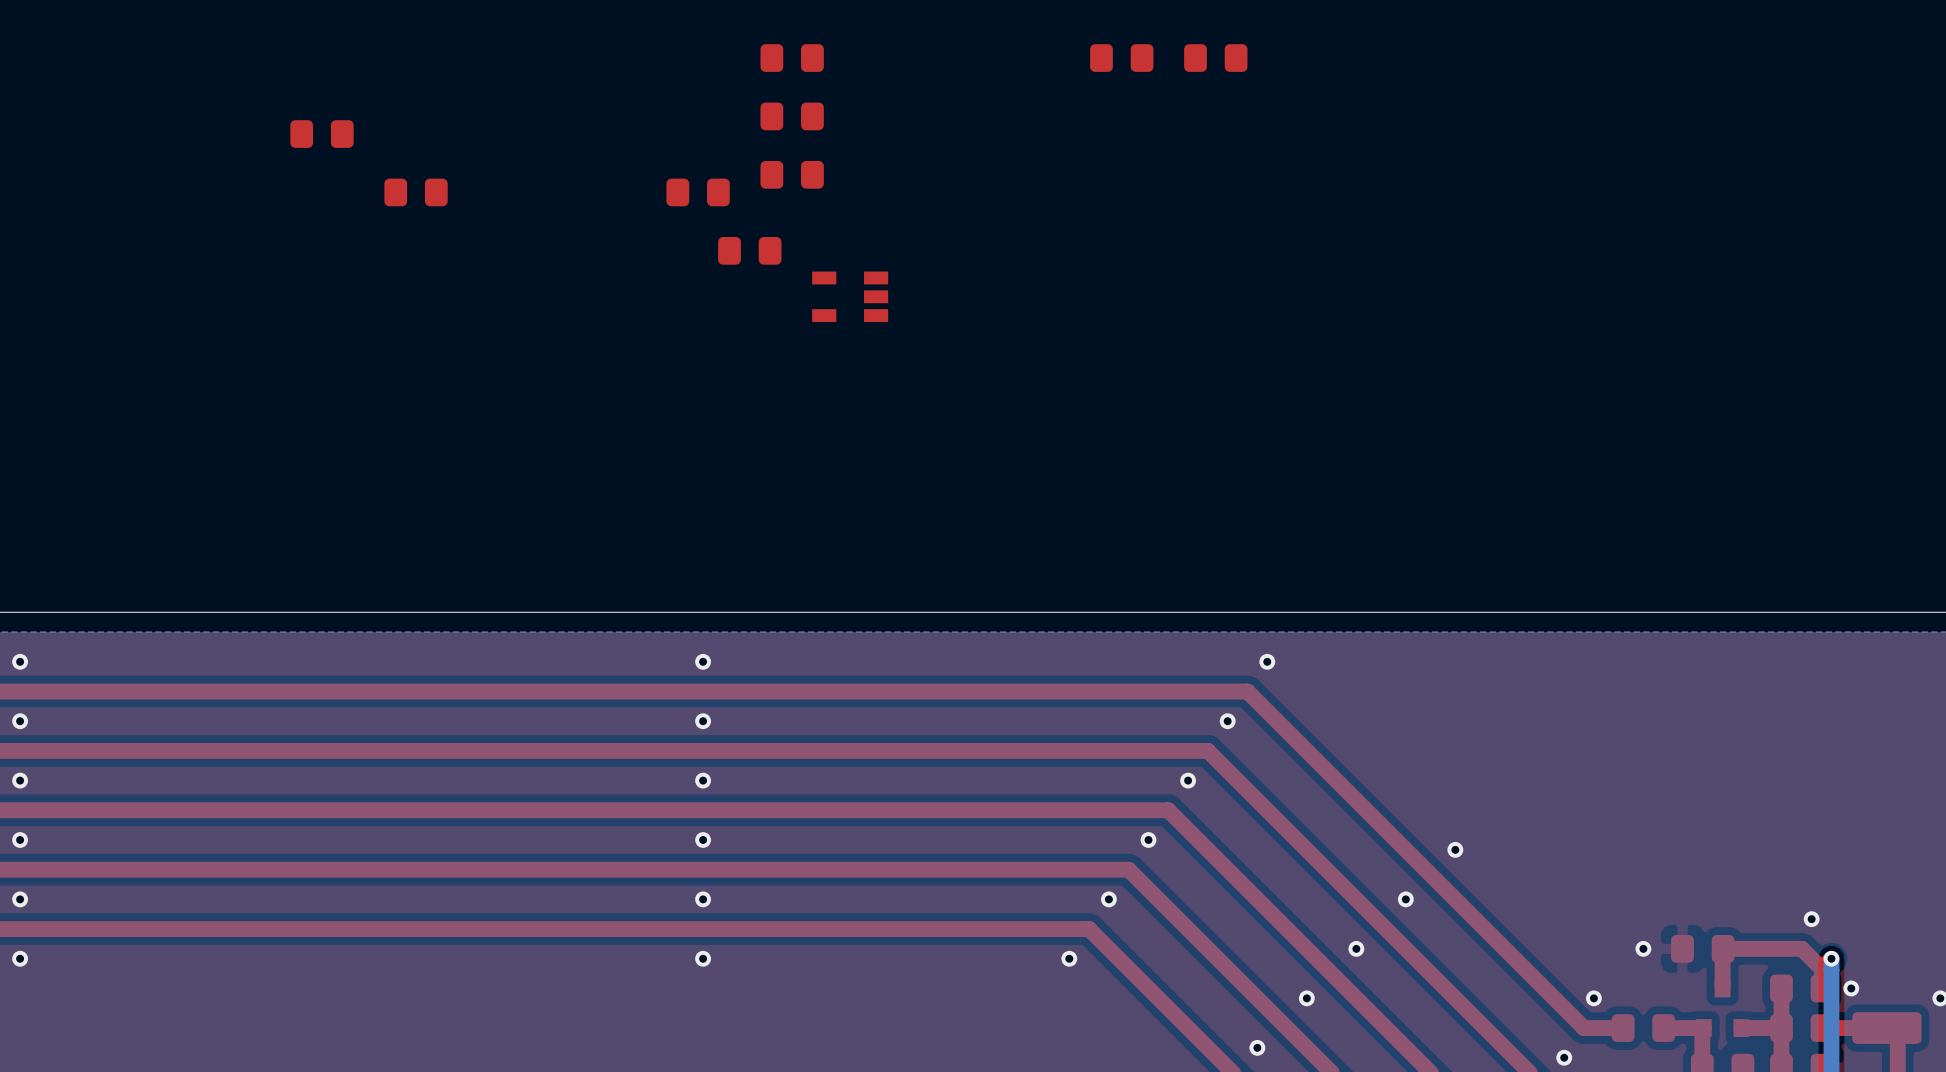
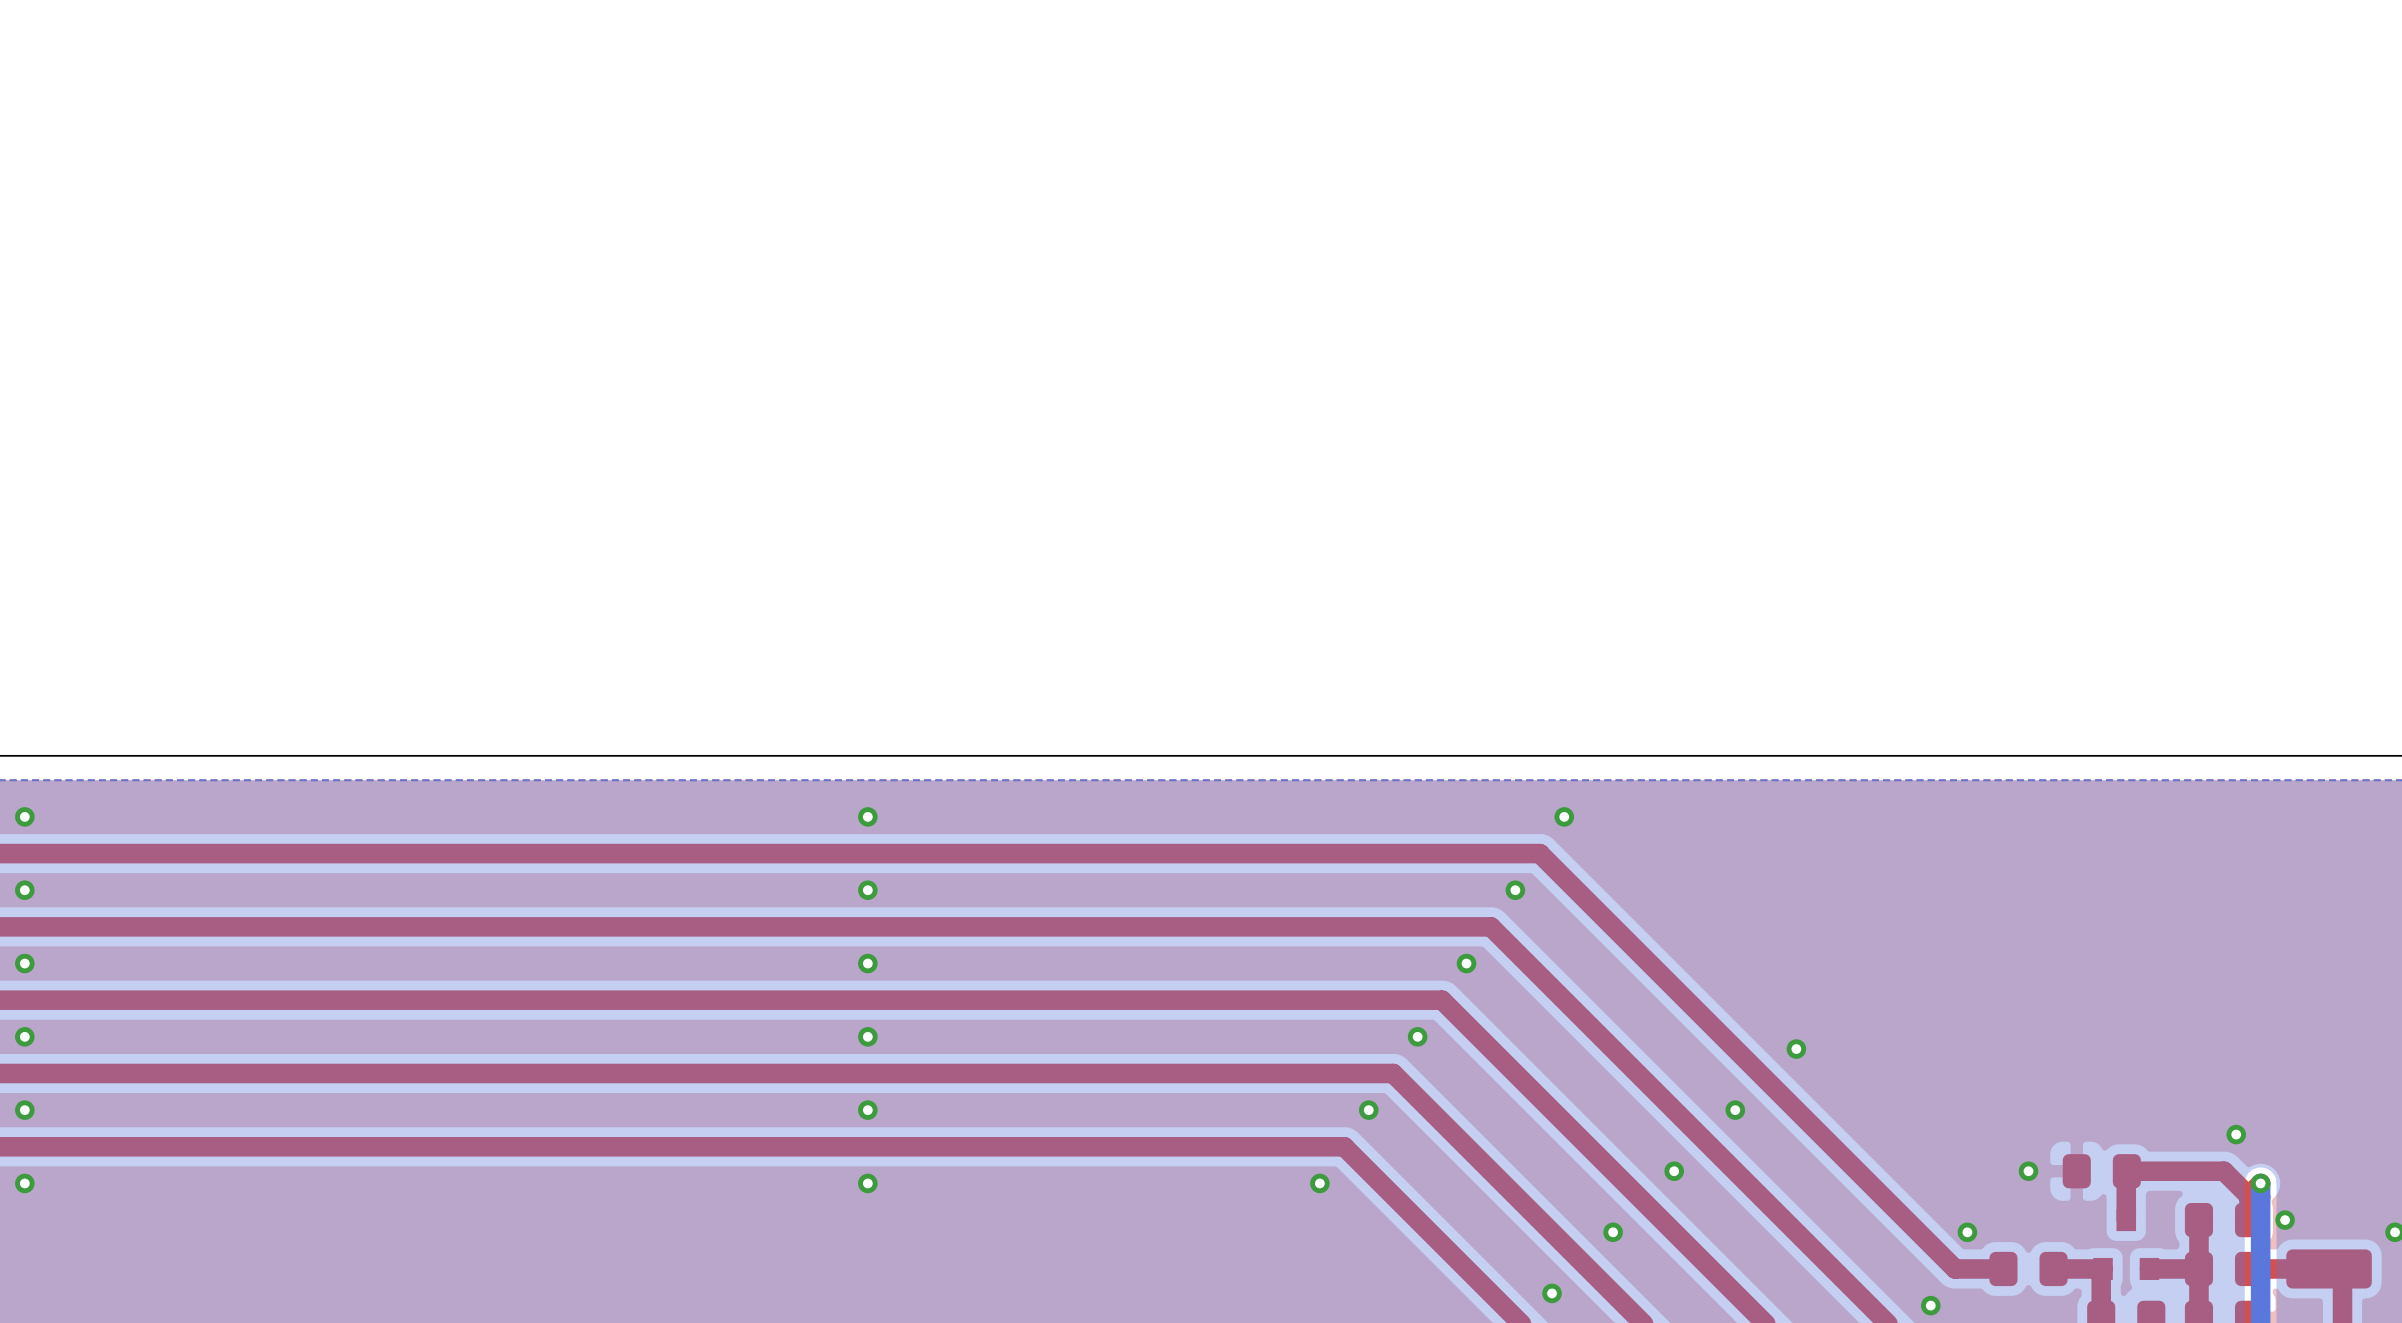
part: (792, 58) -> none
part: (1121, 58) -> none
part: (1215, 58) -> none
part: (792, 116) -> none
part: (322, 134) -> none
part: (792, 174) -> none
part: (416, 192) -> none
part: (698, 192) -> none
part: (749, 250) -> none
part: (850, 296) -> none

